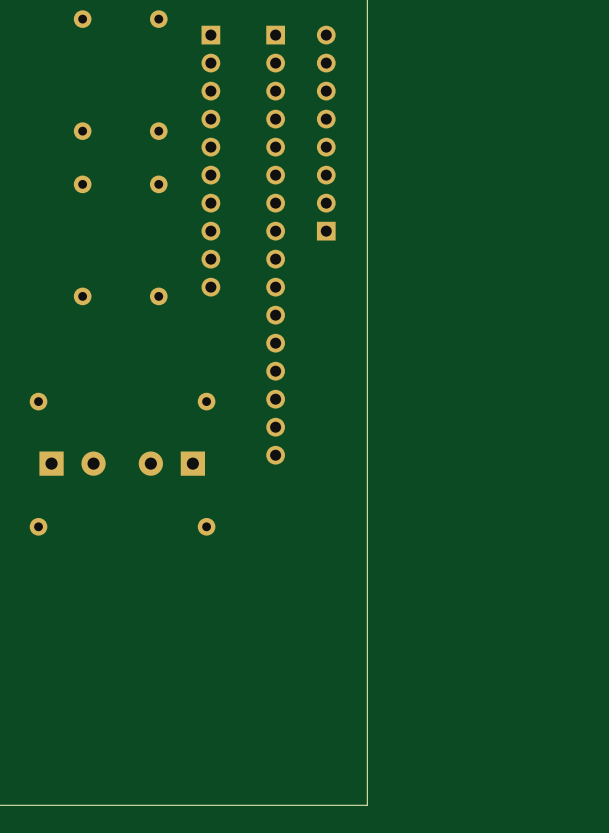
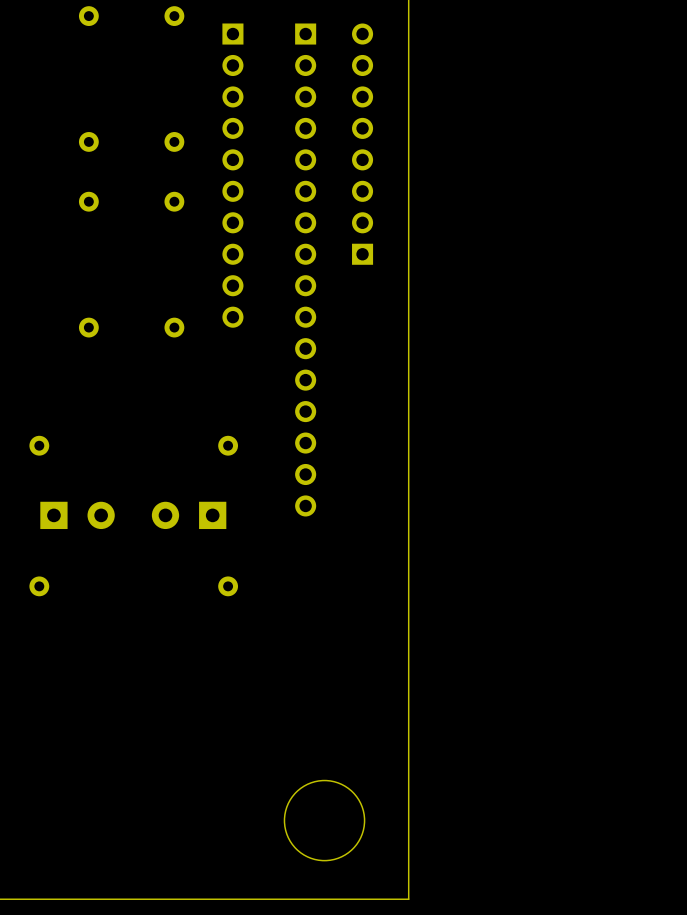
round board edge: none -> [283, 779, 366, 862]

